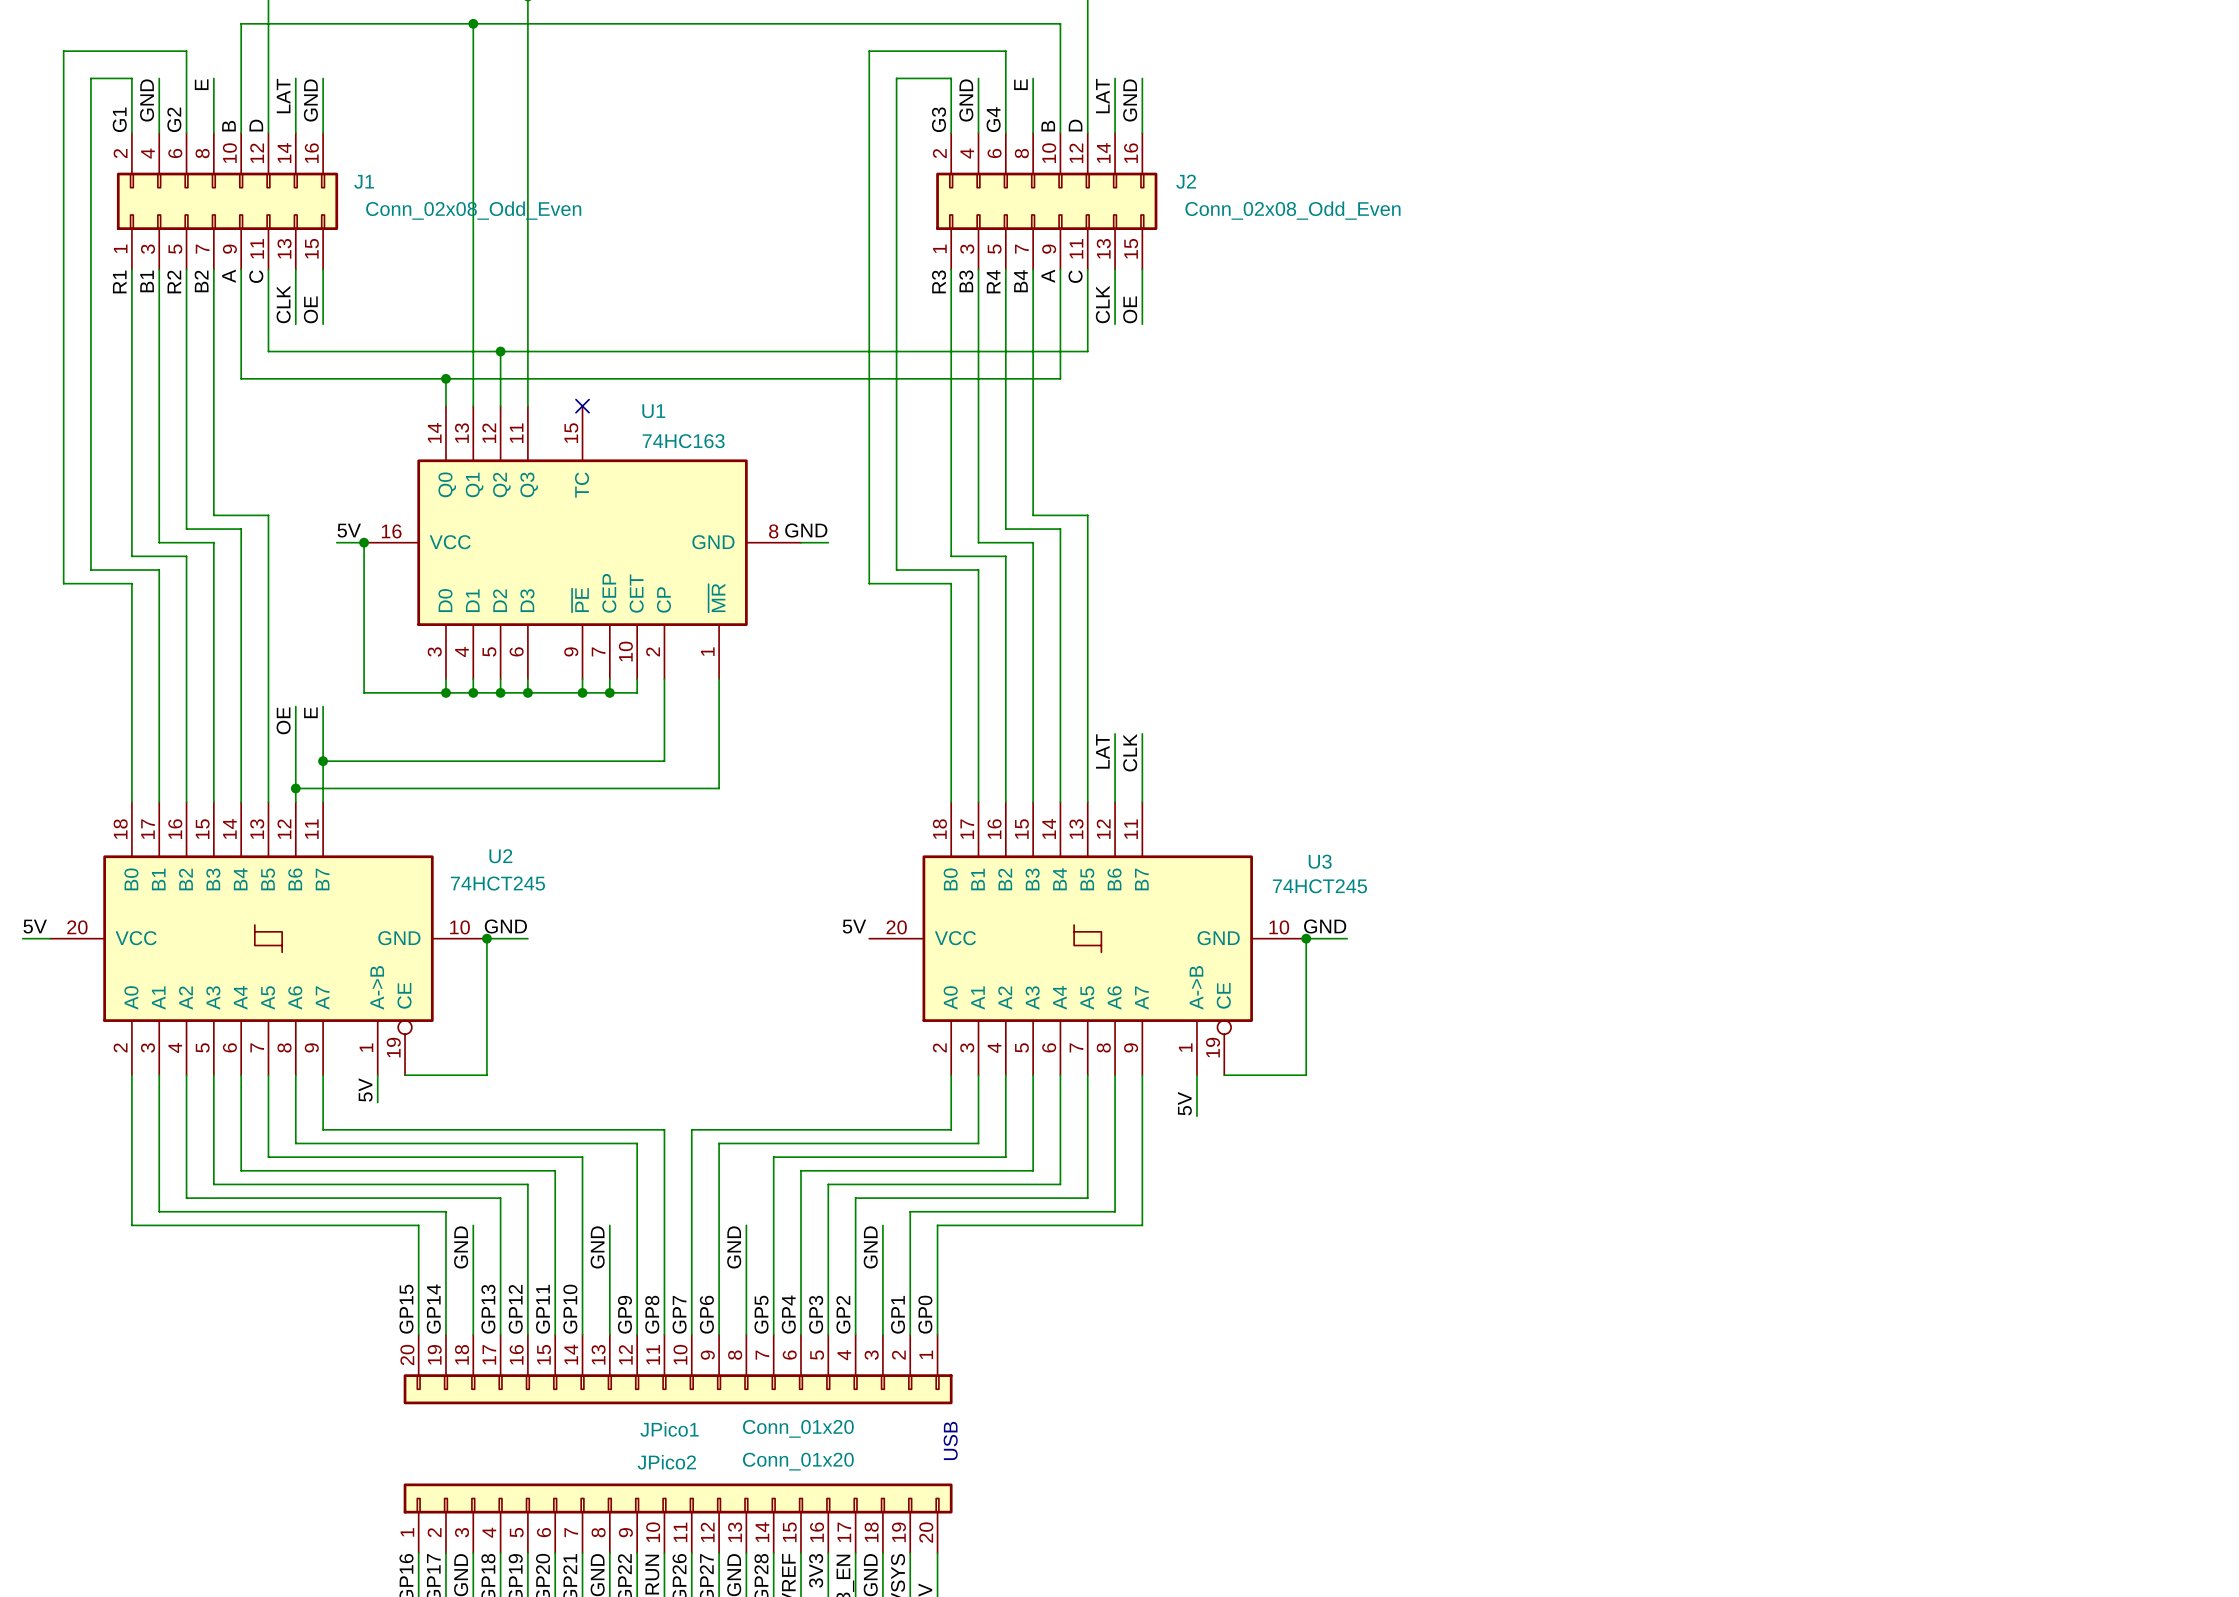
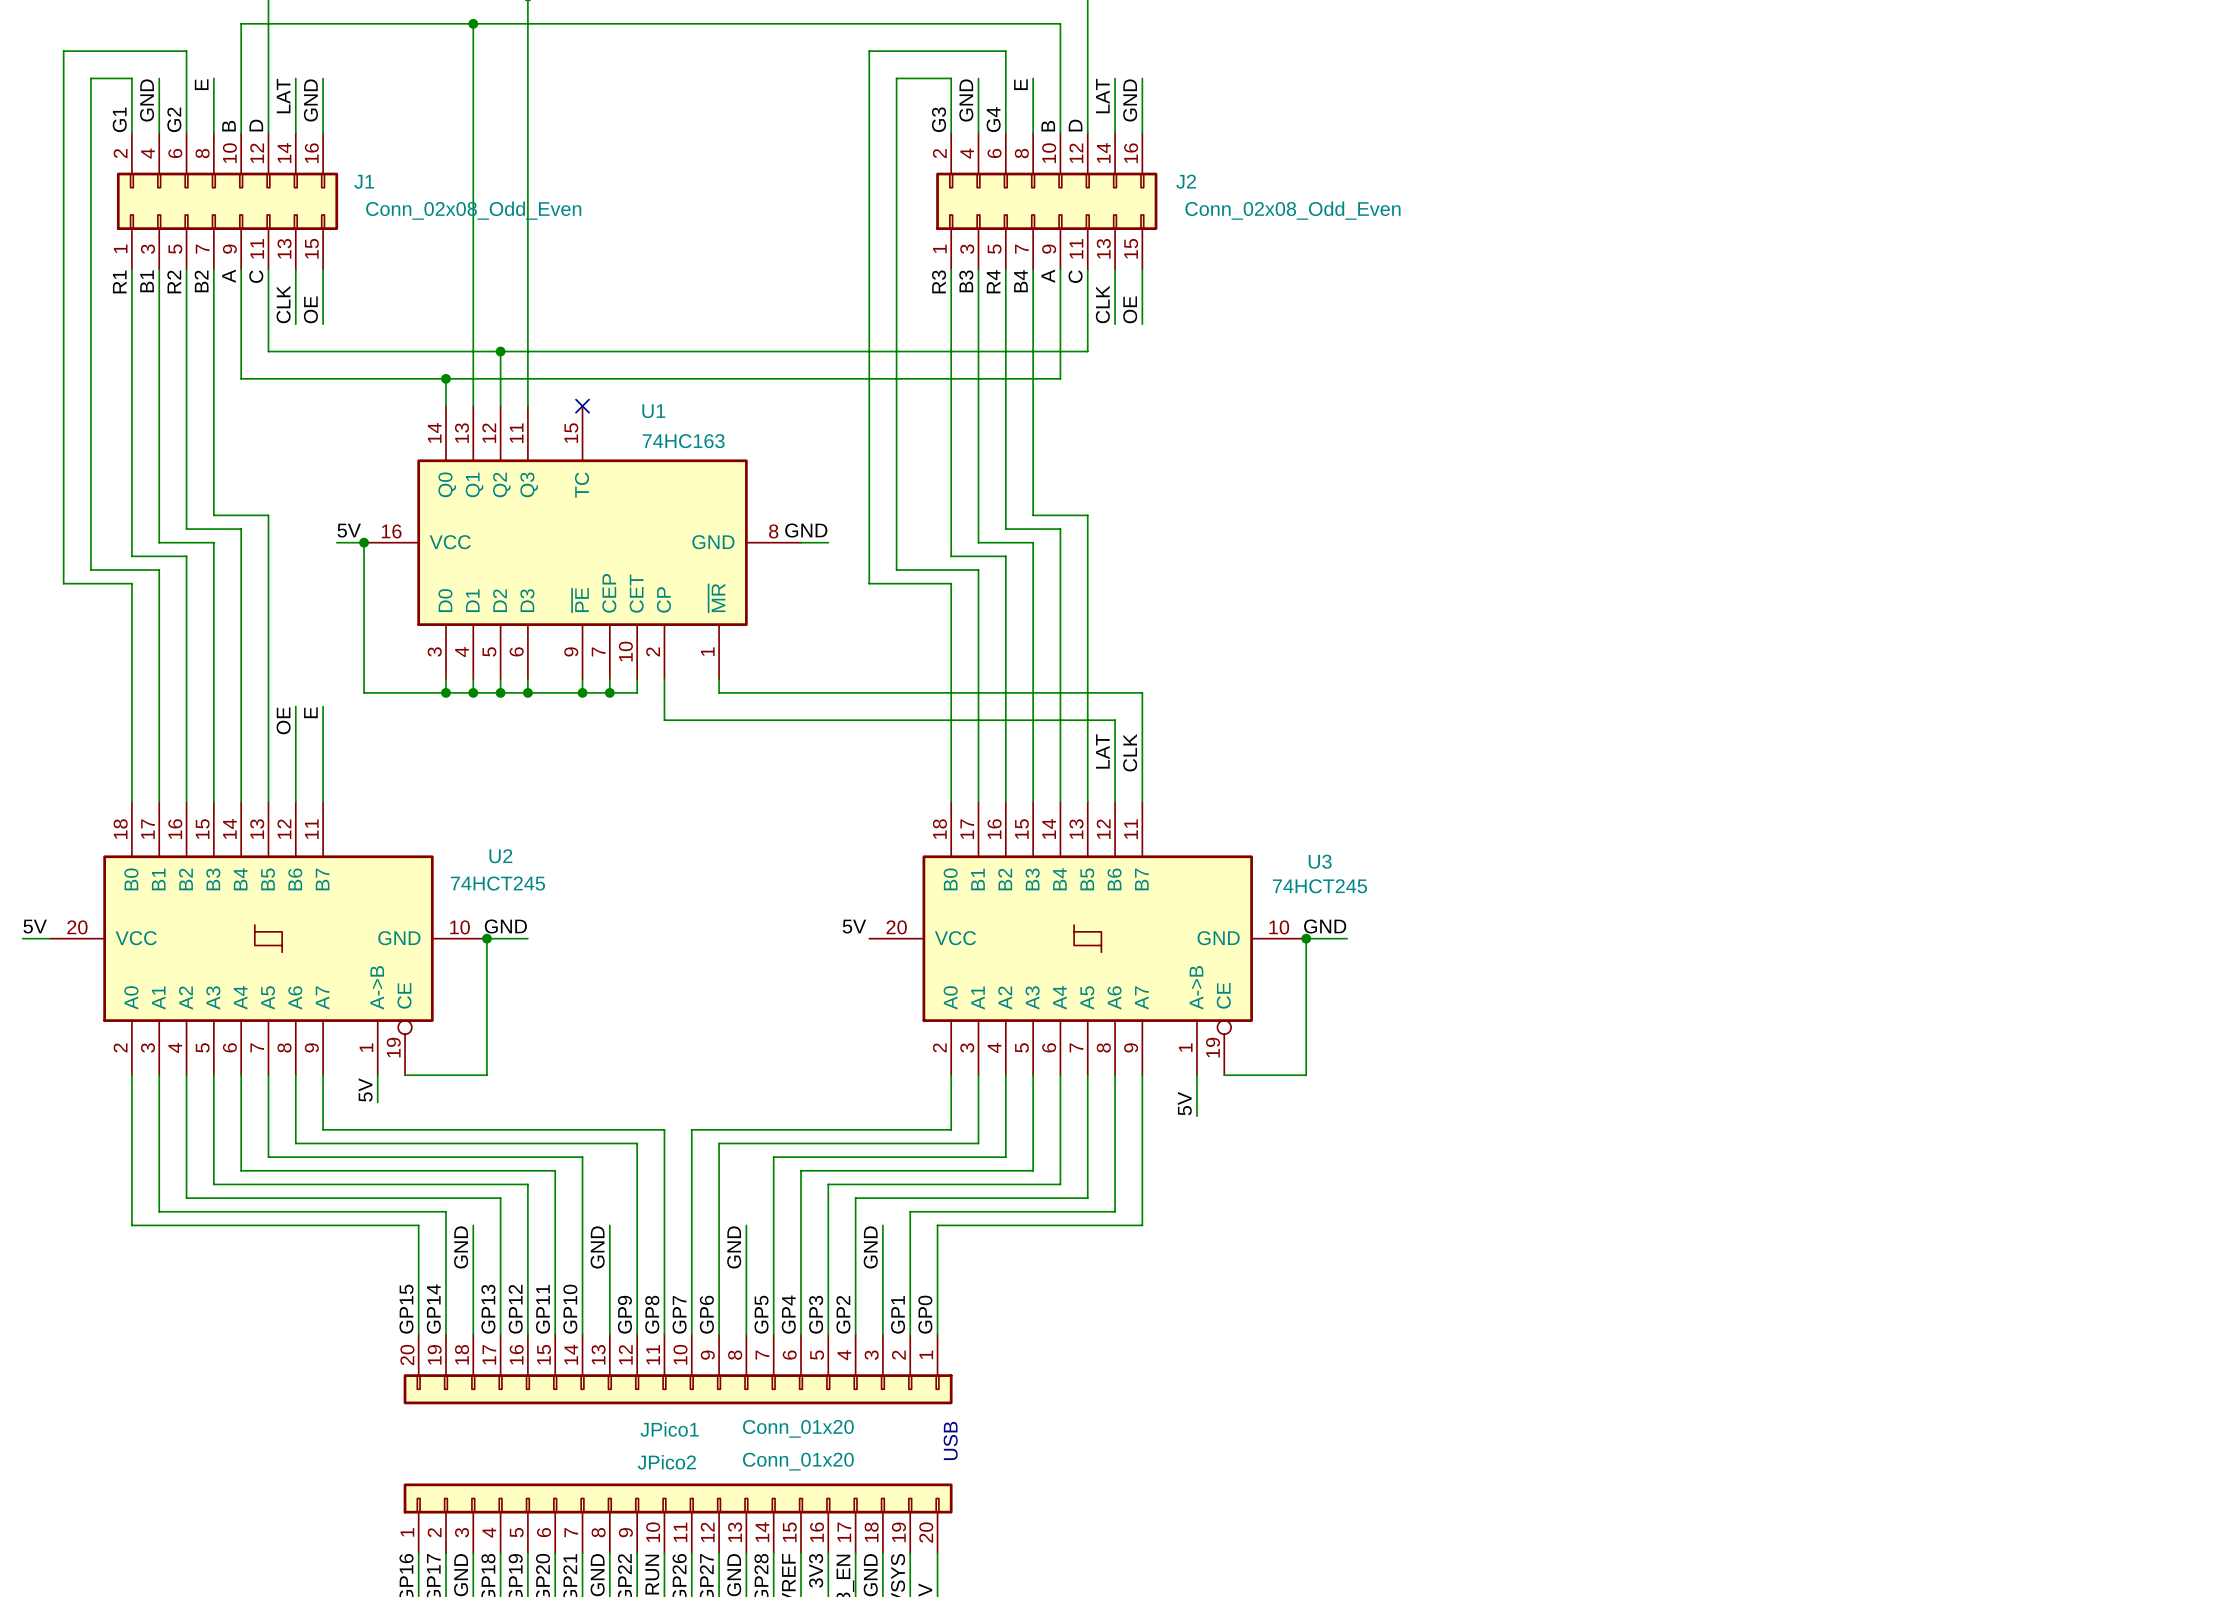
wire: (719, 692) (719, 788) (295, 788) -> (719, 692) (1142, 692) (1142, 733)
wire: (664, 720) (664, 761) (323, 761) -> (664, 720) (1115, 720) (1115, 733)
junction: (323, 761) -> none
junction: (295, 788) -> none

